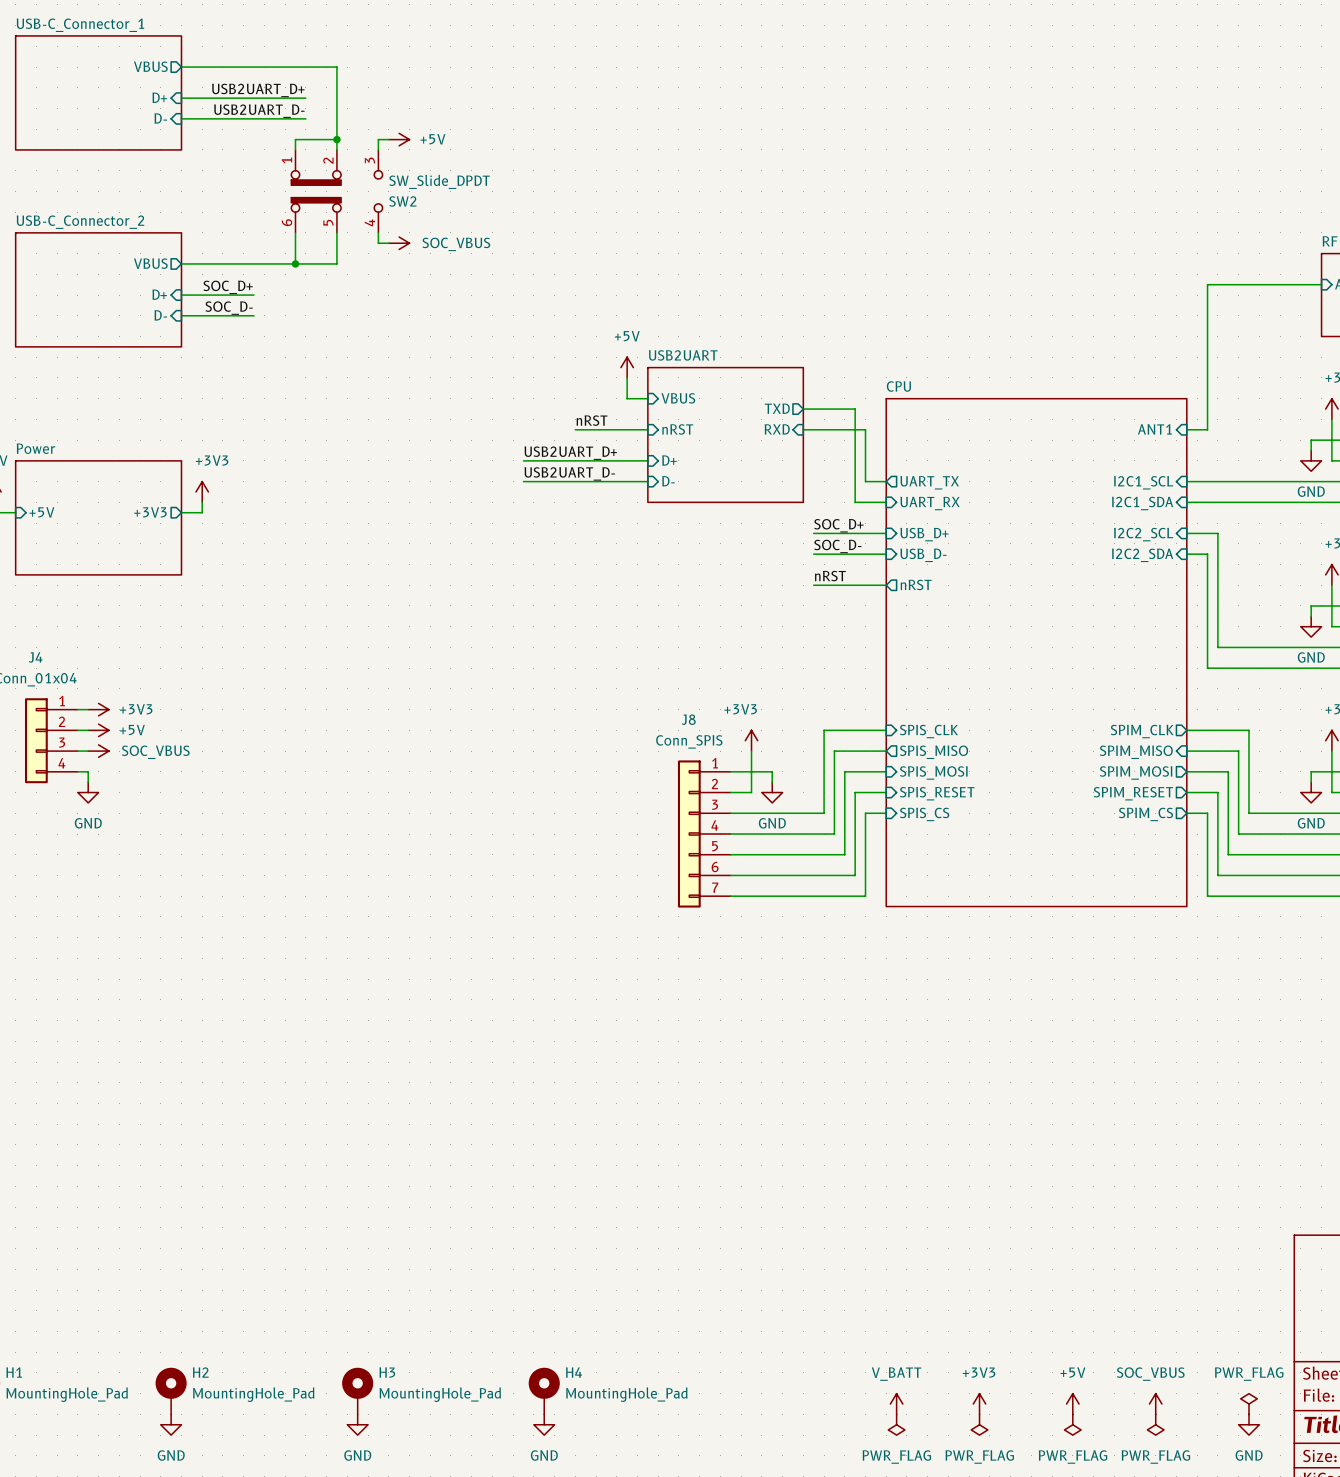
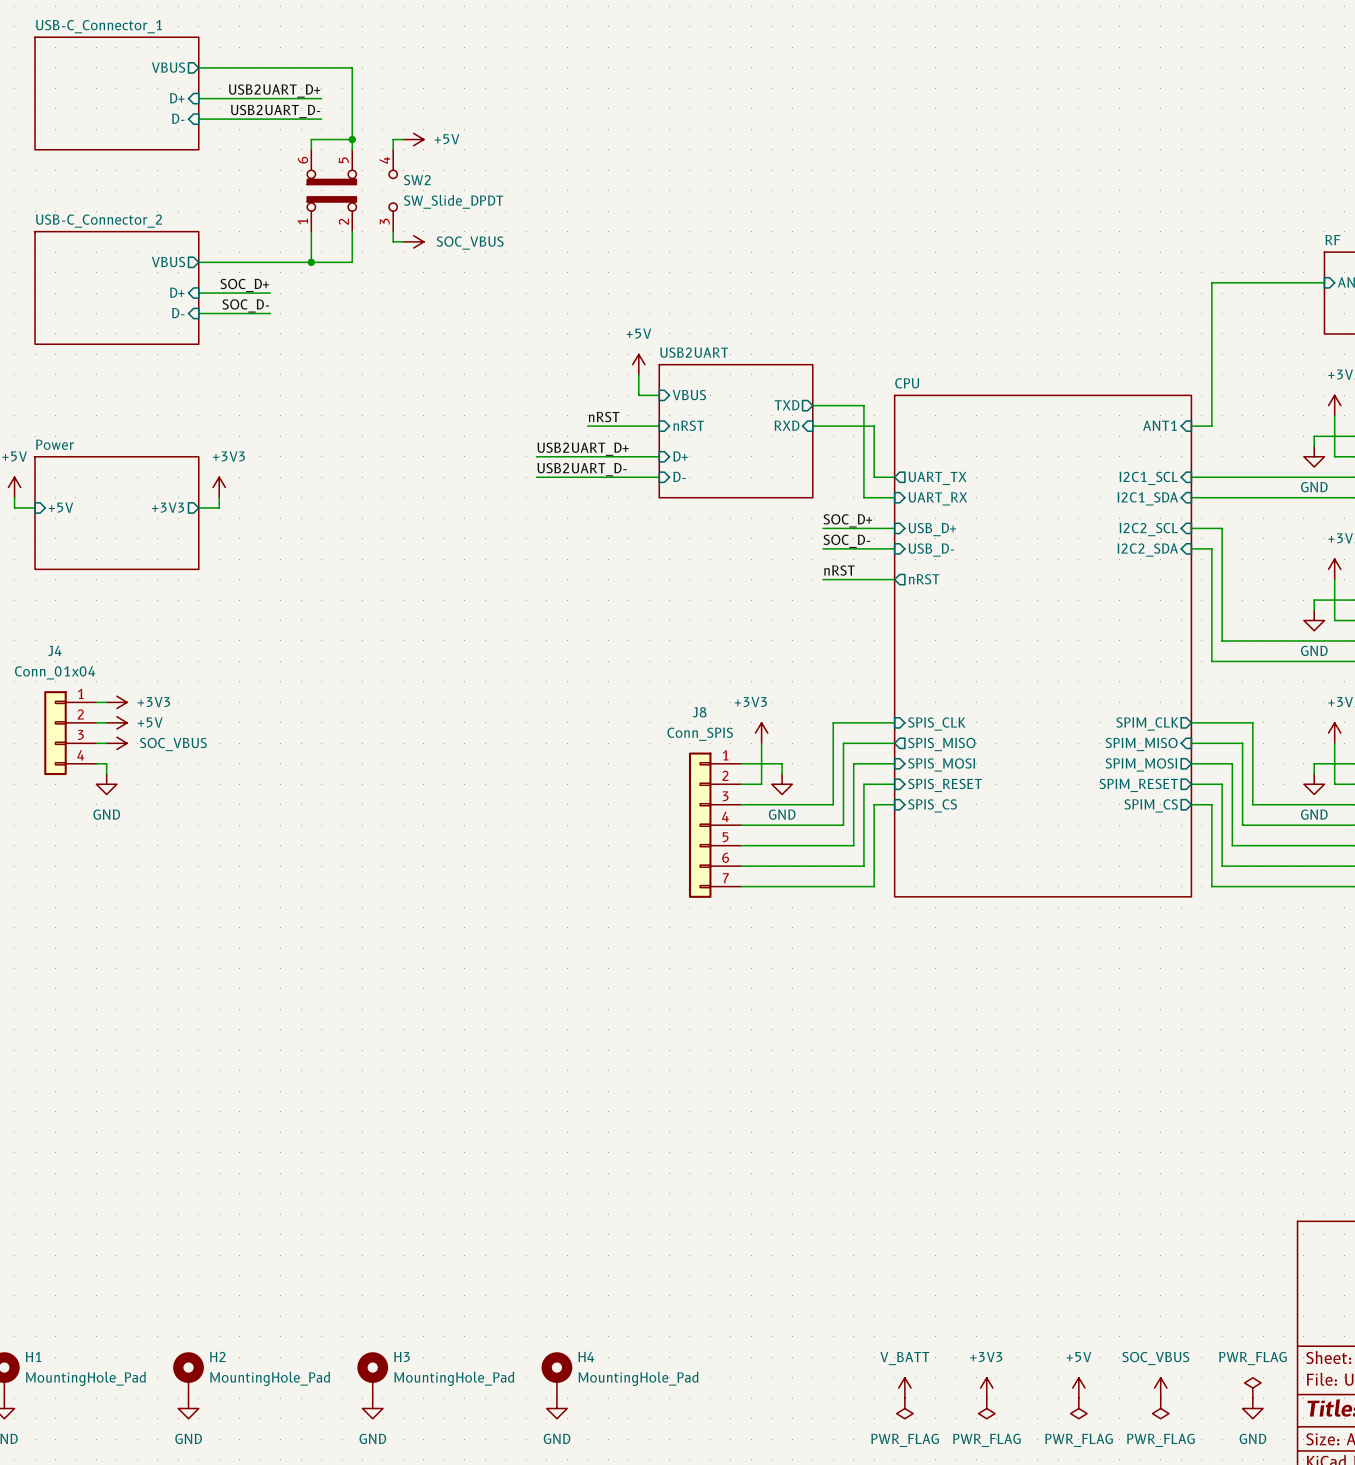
SW2 flip: as is (336, 191) -> up-down (352, 190)

